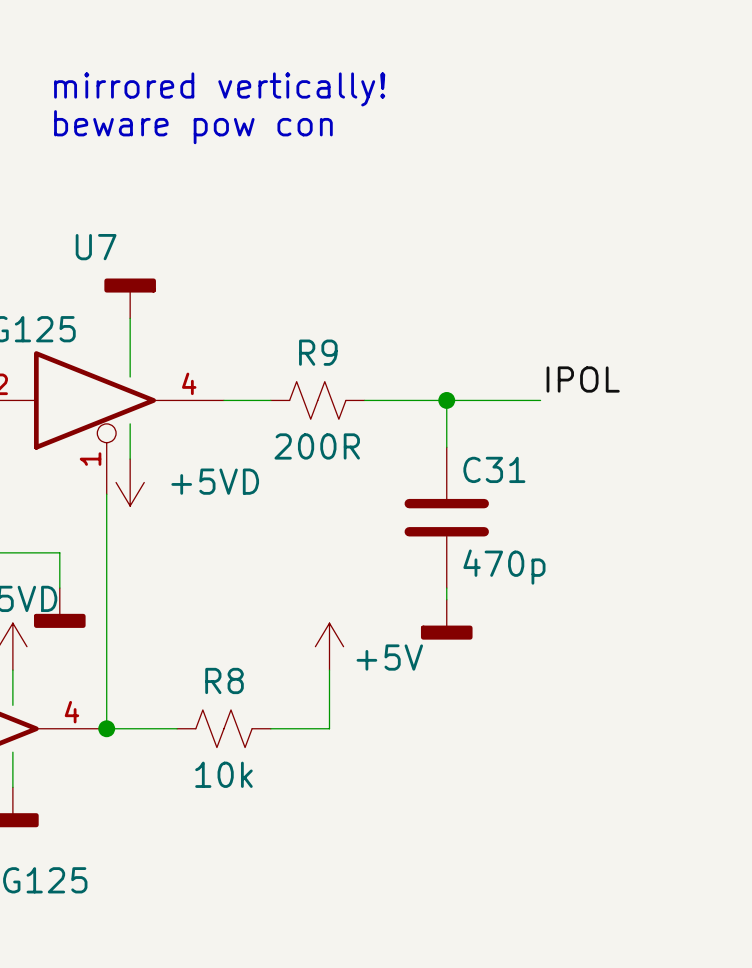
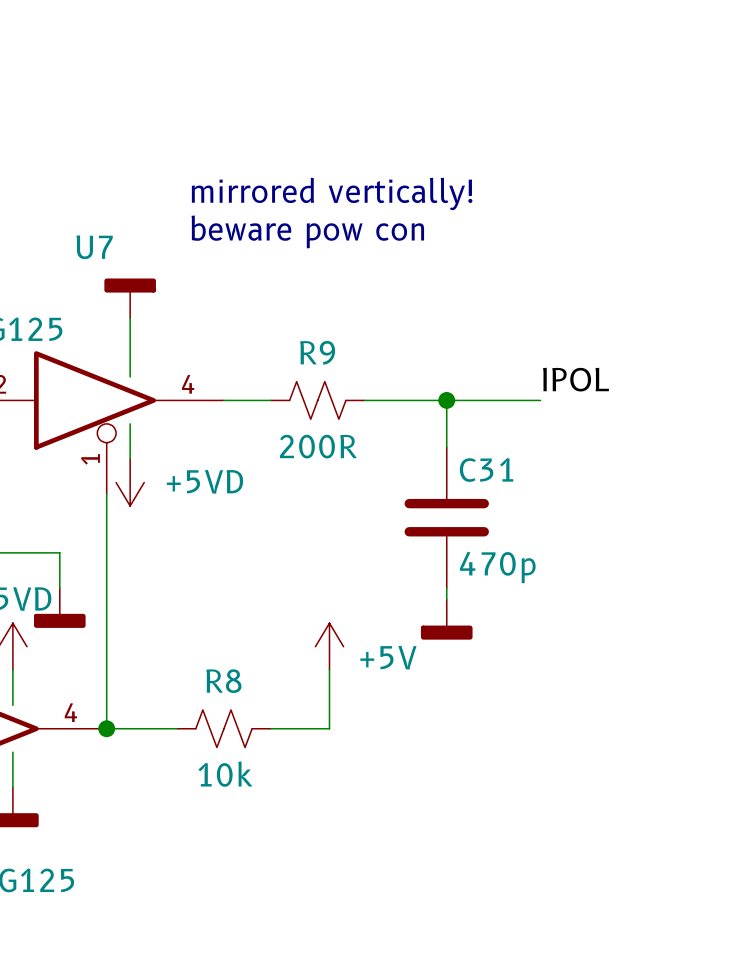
text position: mirrored vertically! (219, 89) -> mirrored vertically! (332, 193)
text position: beware pow con (193, 127) -> beware pow con (307, 231)

